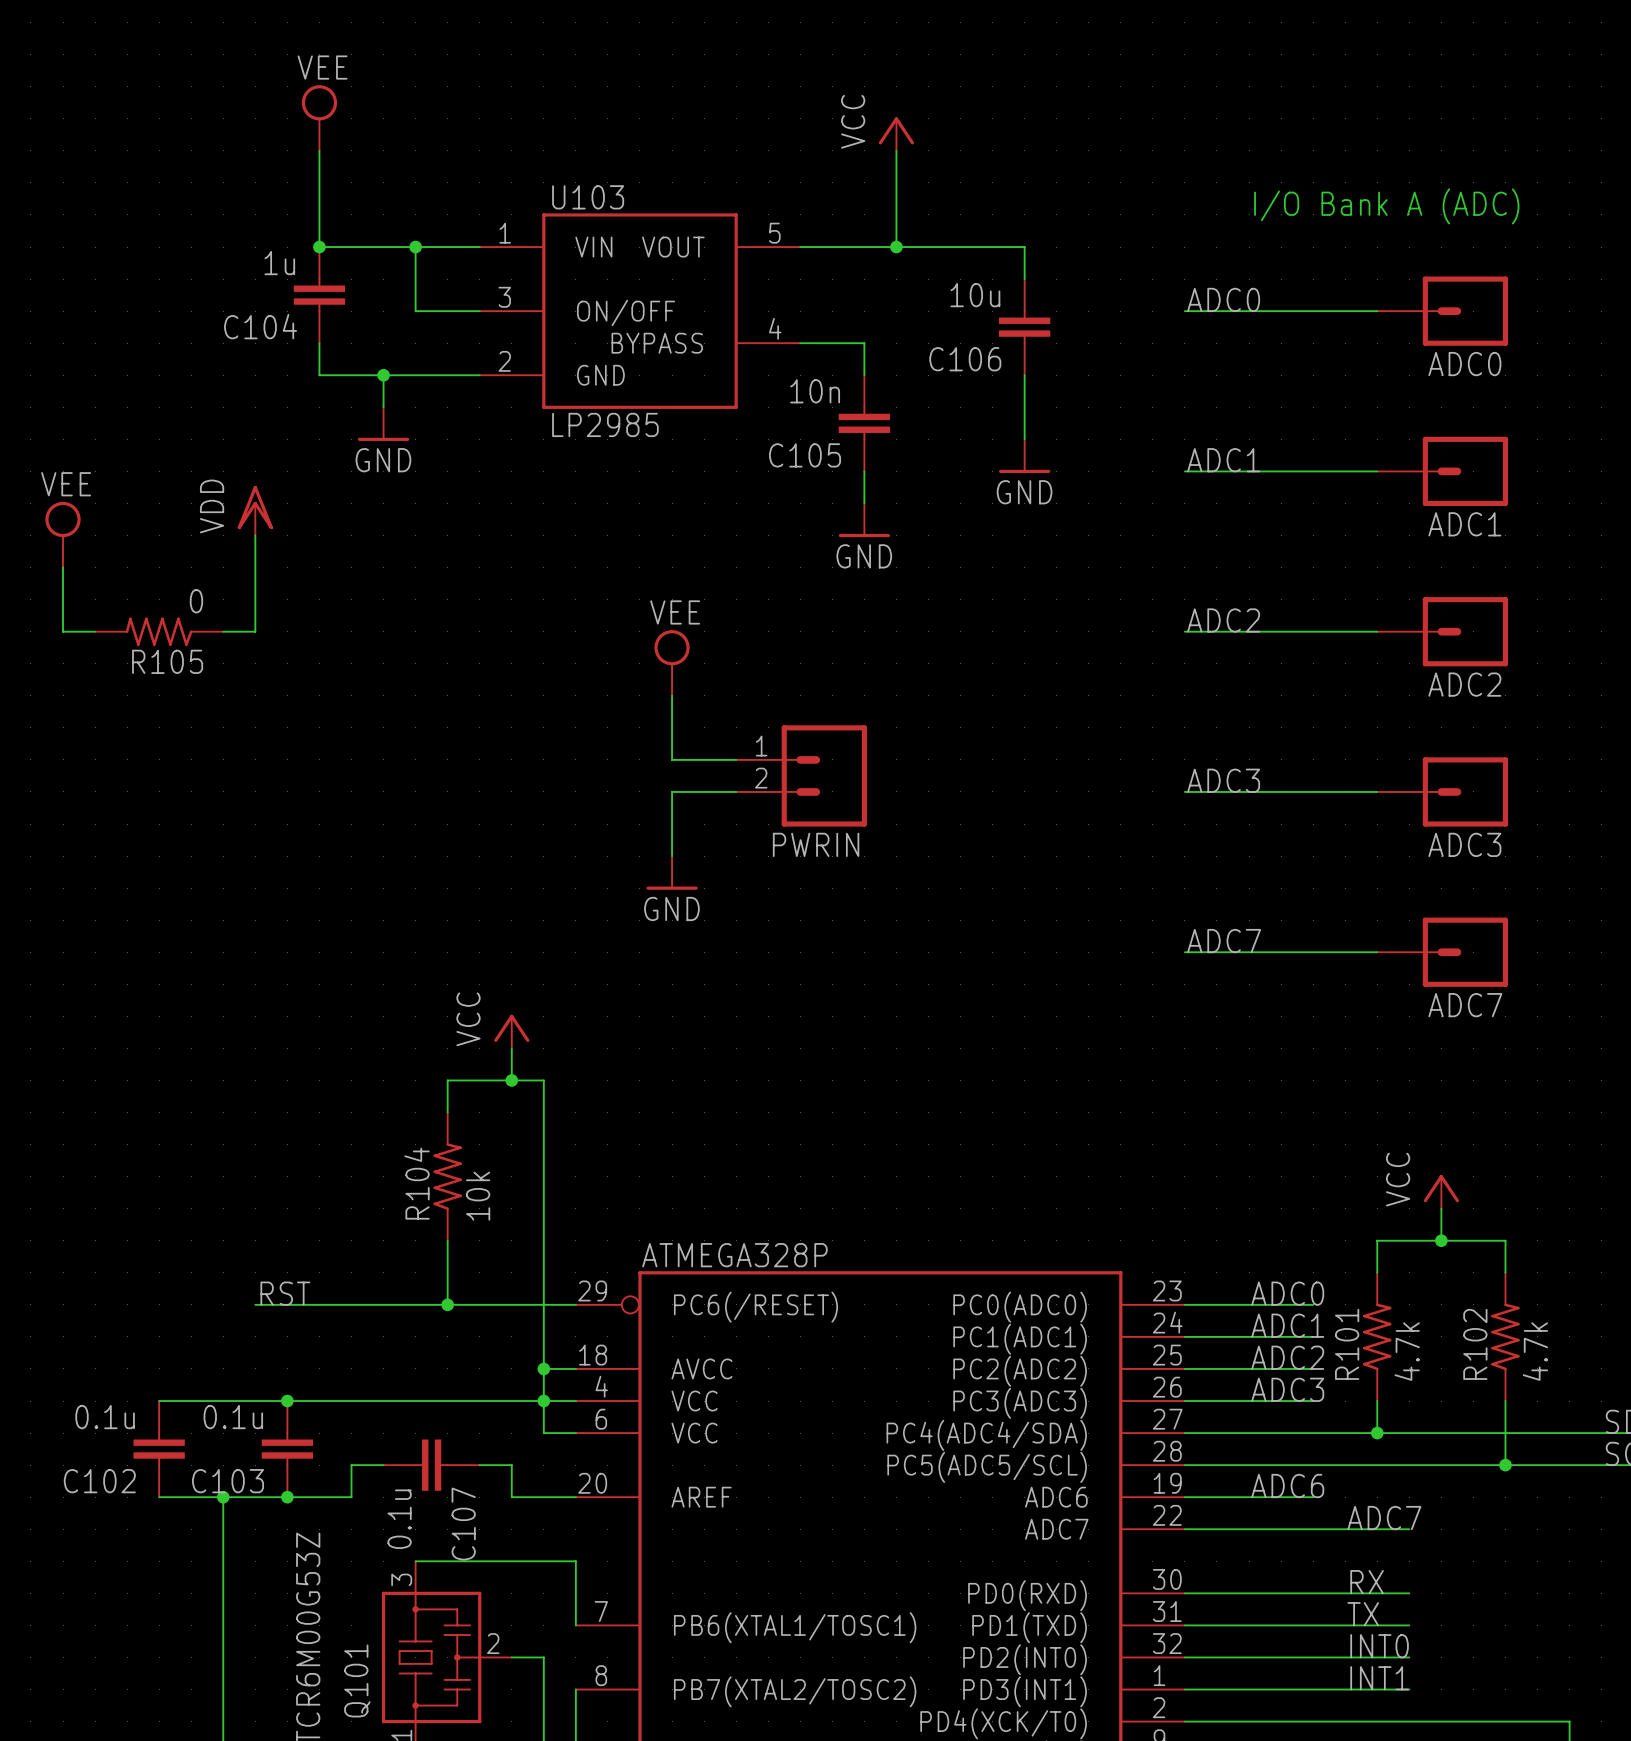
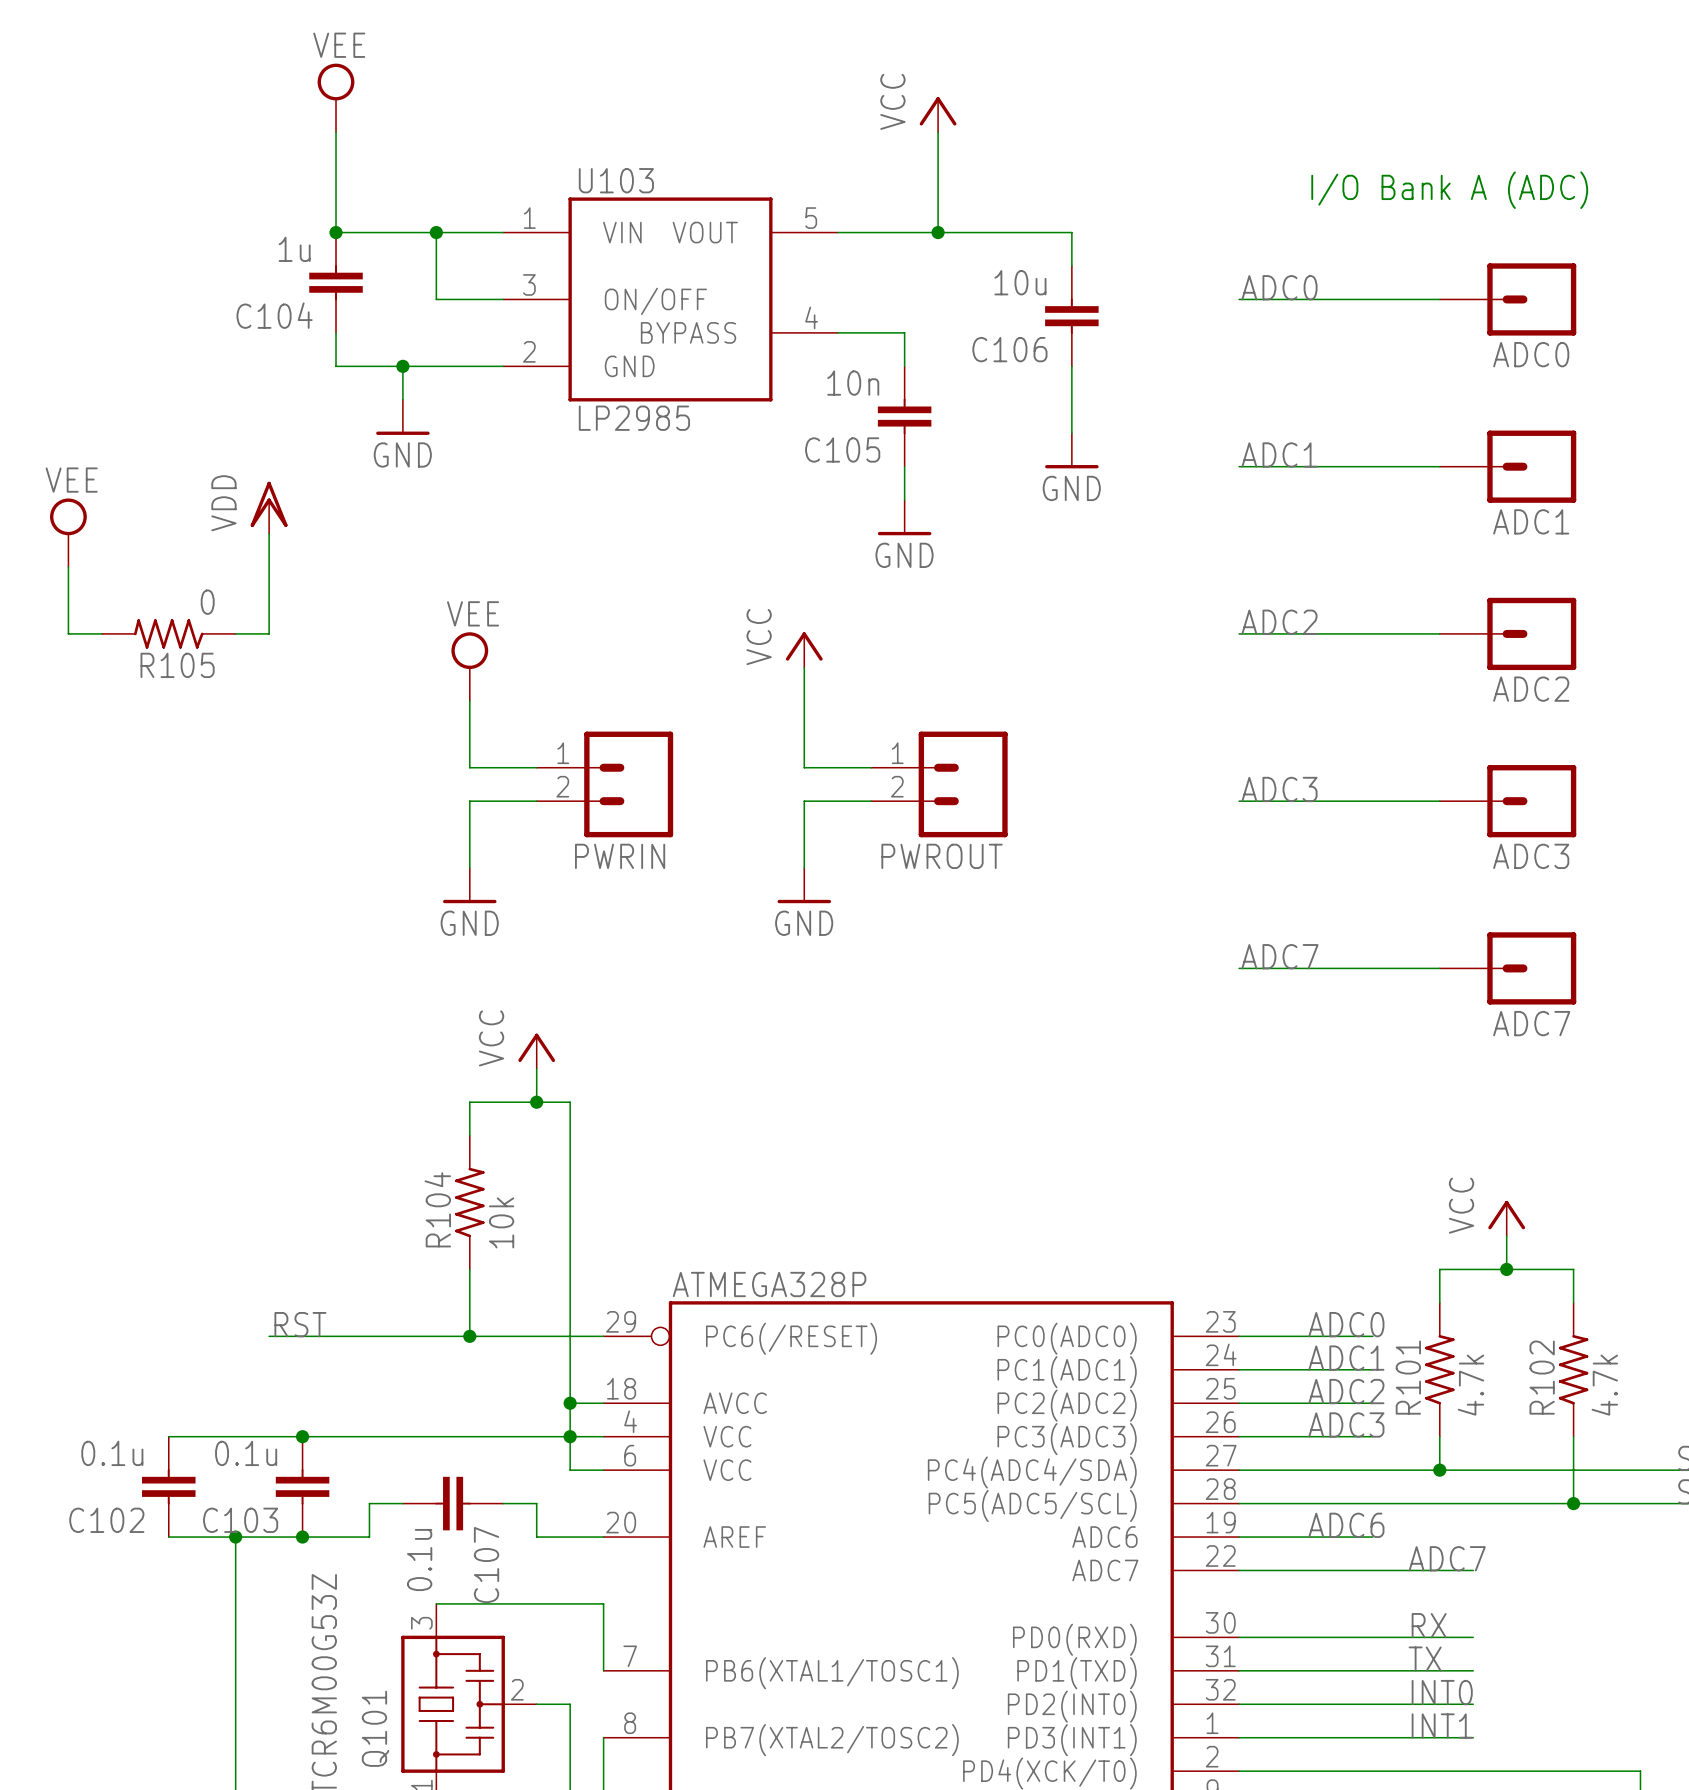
power symbol: none -> VCC (804, 649)
power symbol position: VEE (672, 662) -> VEE (469, 666)
wire: none -> (804, 667) (804, 767) (871, 767)
wire: (672, 695) (672, 759) (736, 759) -> (469, 700) (469, 767) (536, 767)
PWRIN position: (801, 775) -> (604, 784)
PWROUT: none -> (939, 784)
wire: none -> (536, 801) (469, 801) (469, 868)
wire: (736, 791) (672, 791) (672, 856) -> (871, 801) (804, 801) (804, 868)
power symbol: none -> GND (469, 885)
power symbol position: GND (672, 872) -> GND (804, 885)

